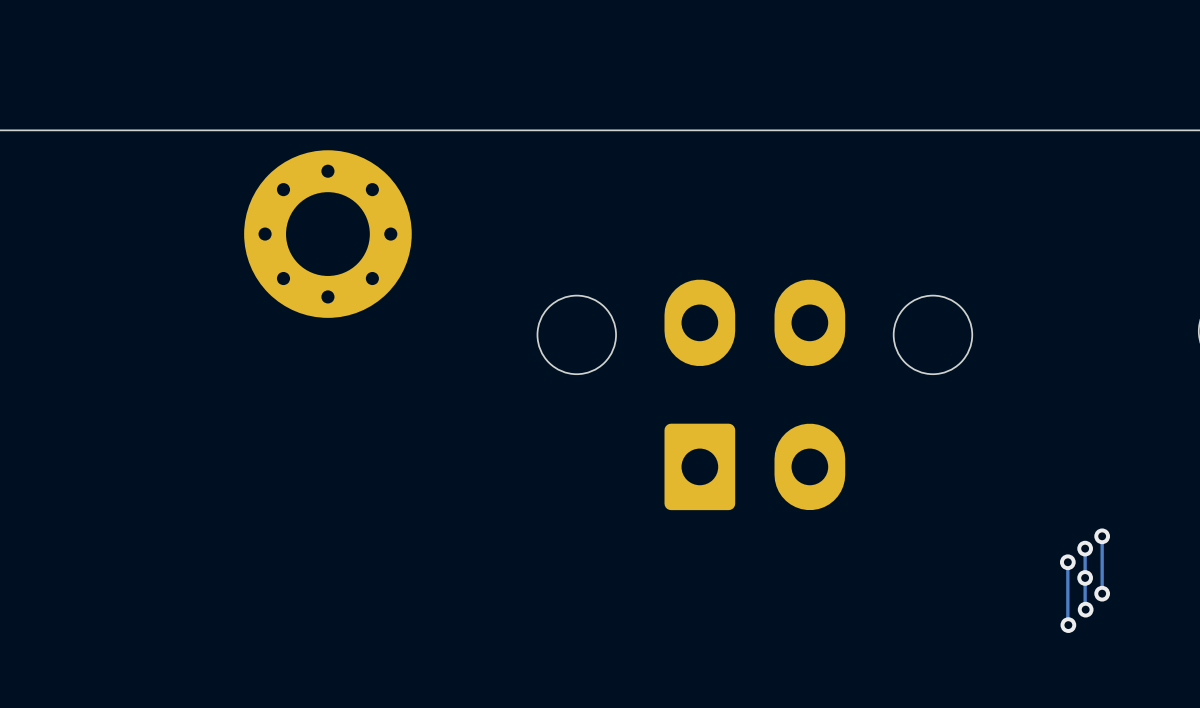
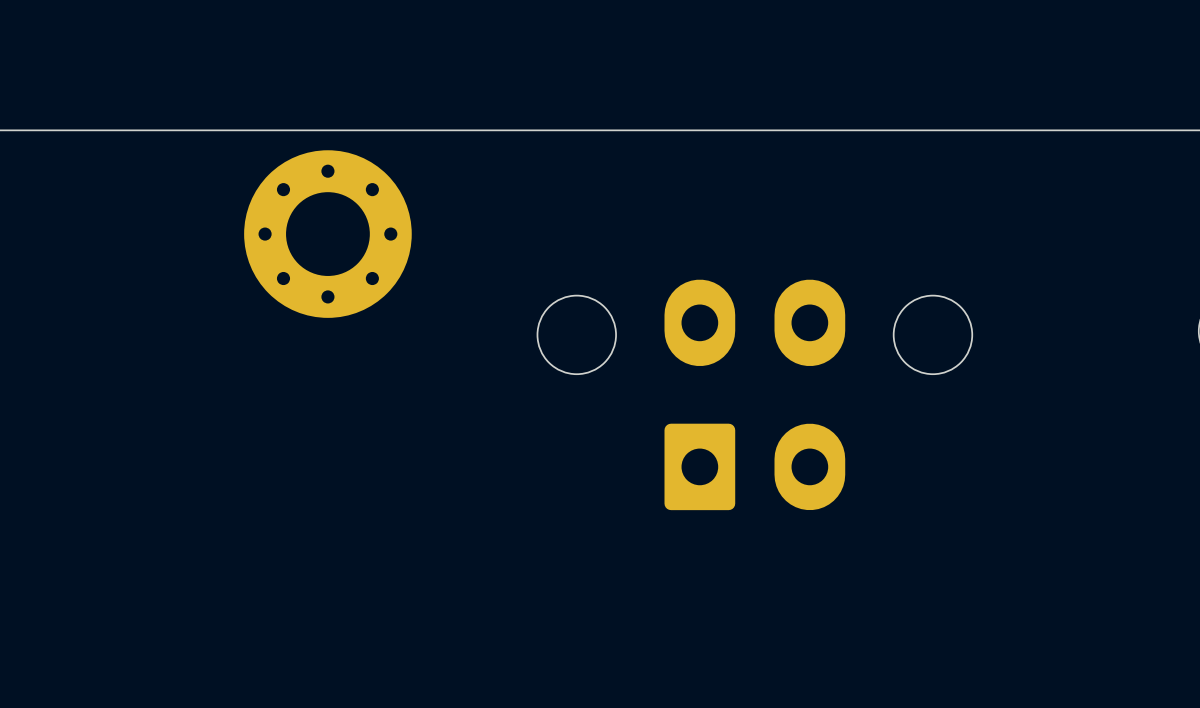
track: (1102, 536) (1102, 593) -> none
via: (1102, 536) -> none
track: (1085, 548) (1085, 609) -> none
via: (1085, 548) -> none
track: (1067, 562) (1068, 625) -> none
via: (1067, 562) -> none
via: (1085, 577) -> none
via: (1102, 593) -> none
via: (1085, 609) -> none
via: (1068, 625) -> none

